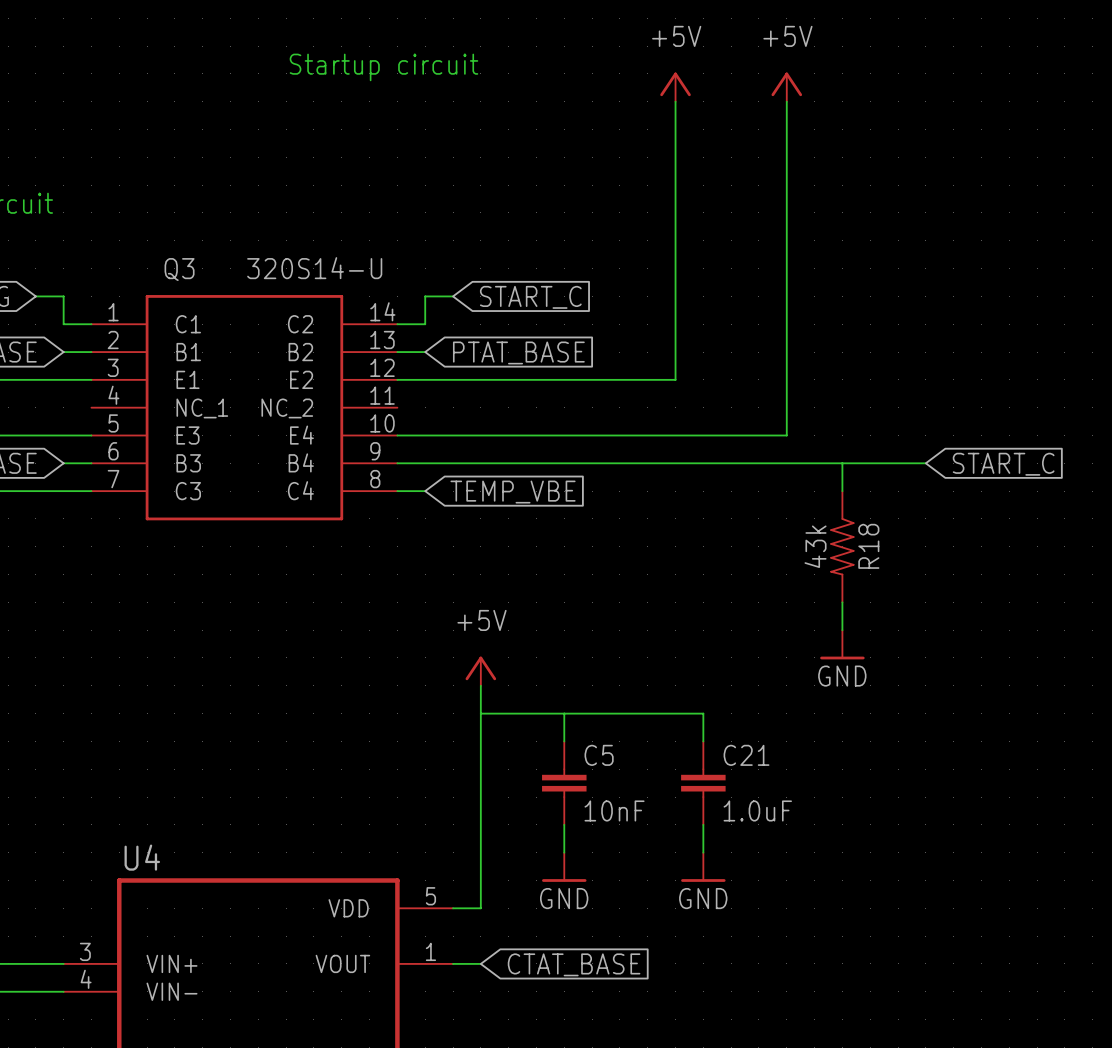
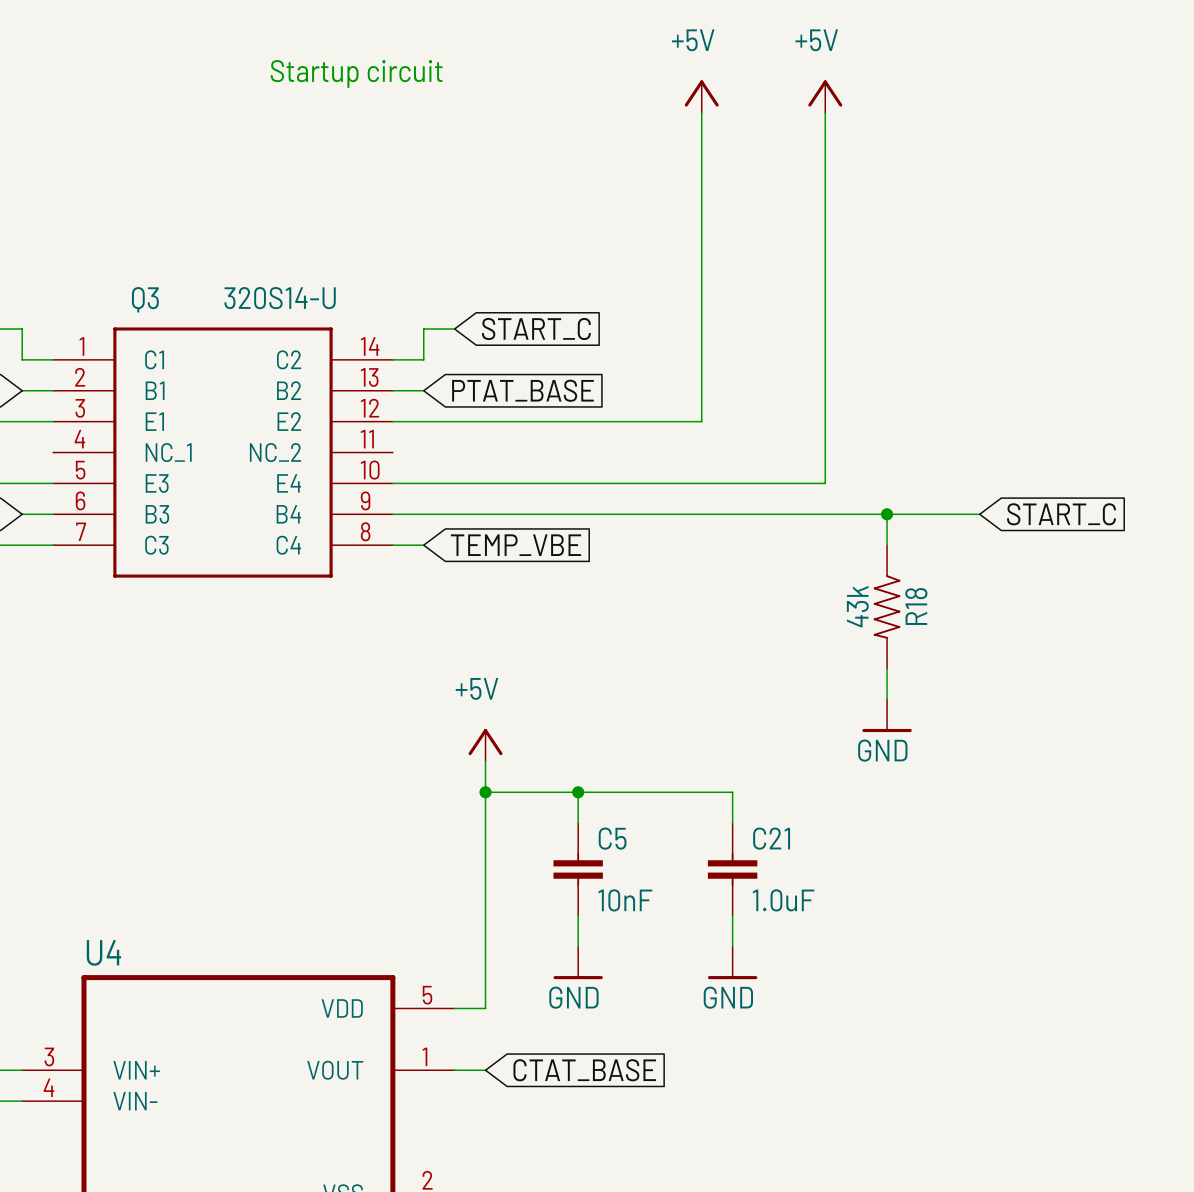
junction: none -> (887, 514)
junction: none -> (485, 792)
junction: none -> (578, 792)

